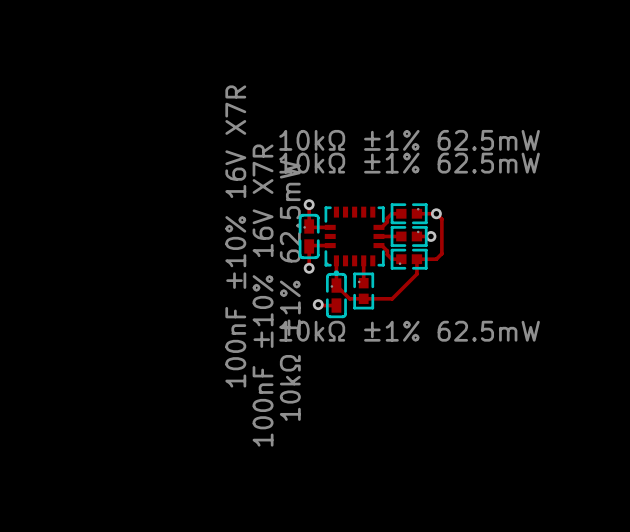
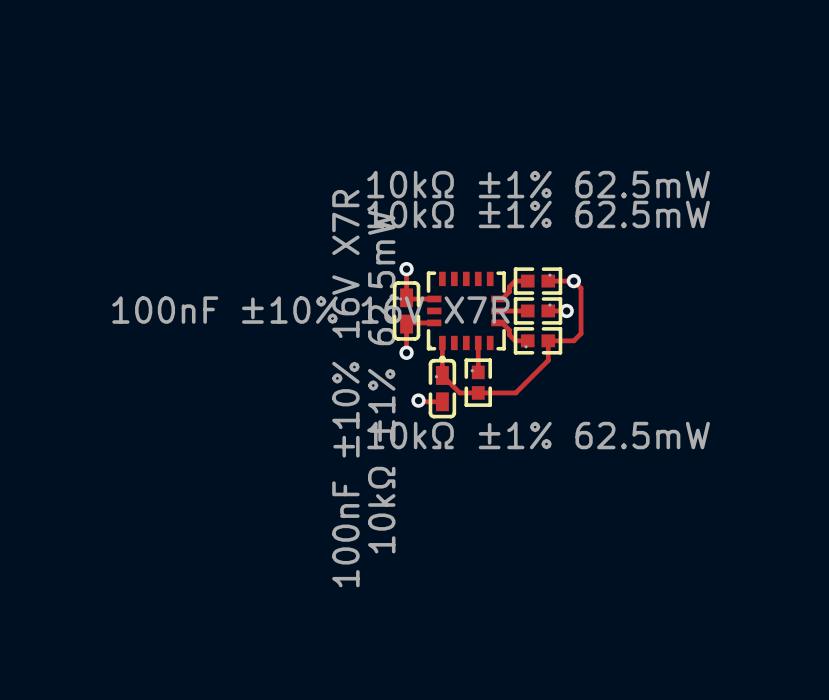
part value rotation: 0° (235, 236) -> 90° clockwise (310, 310)

